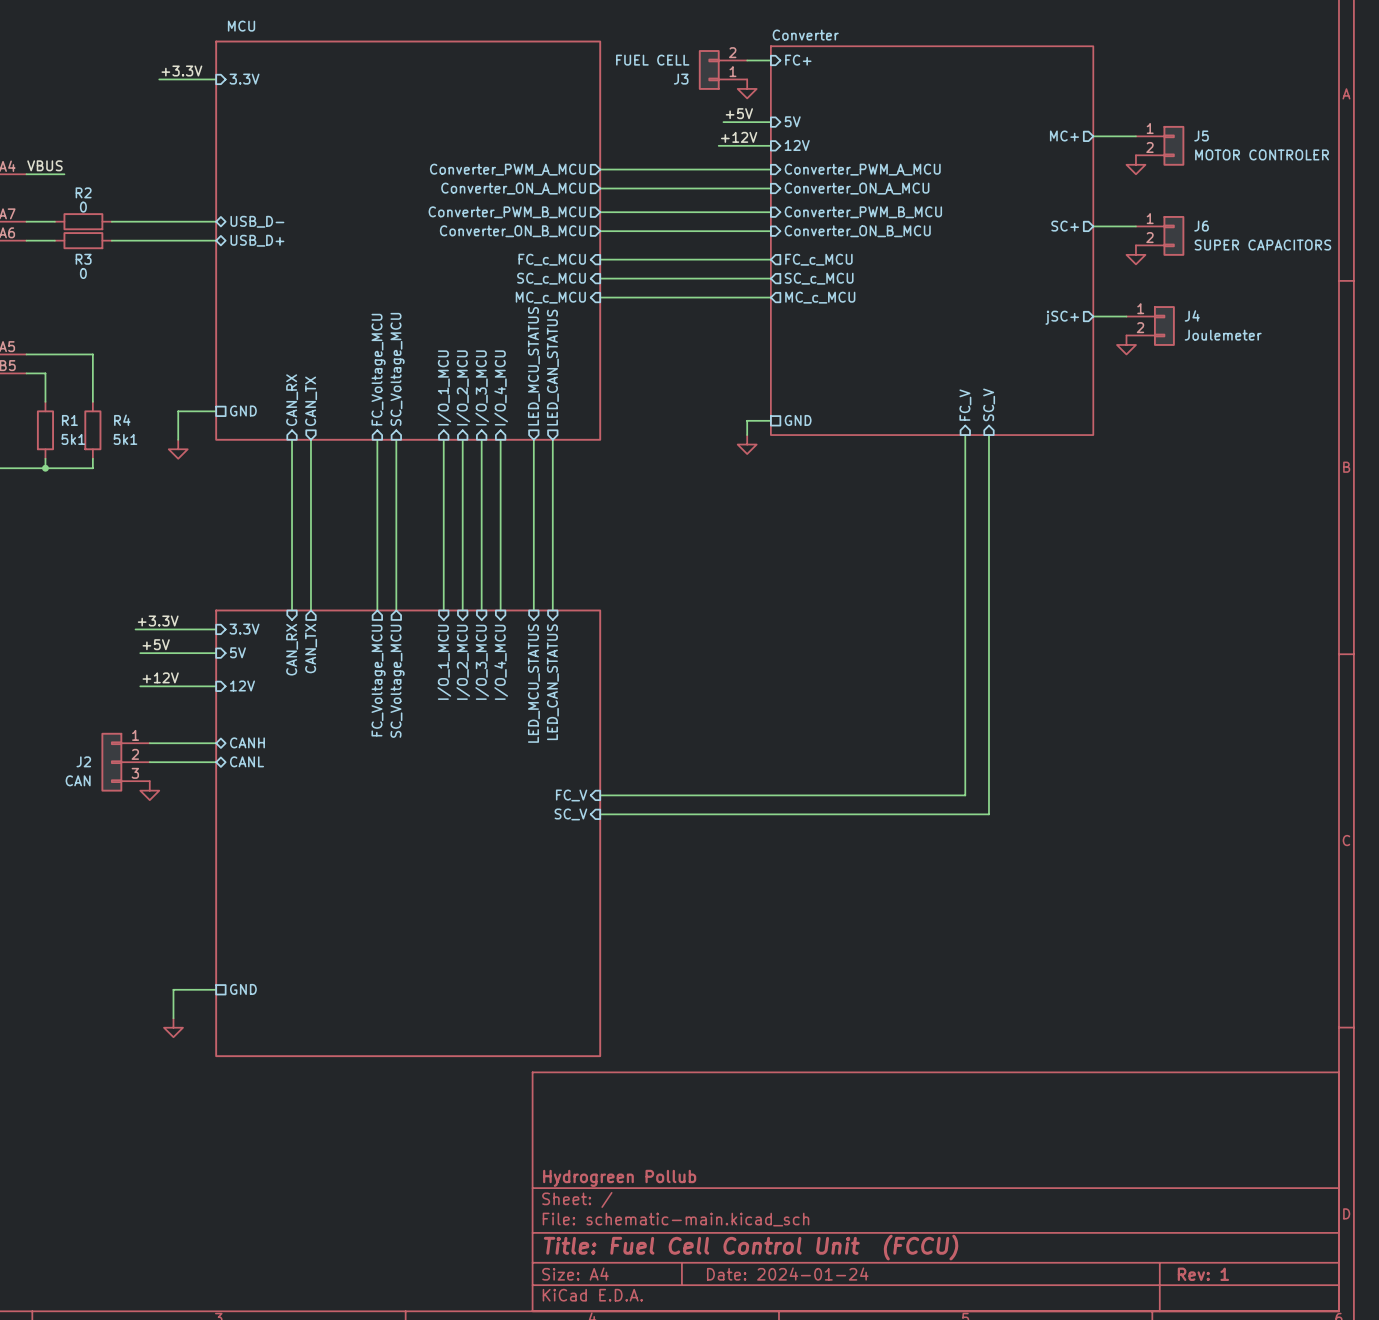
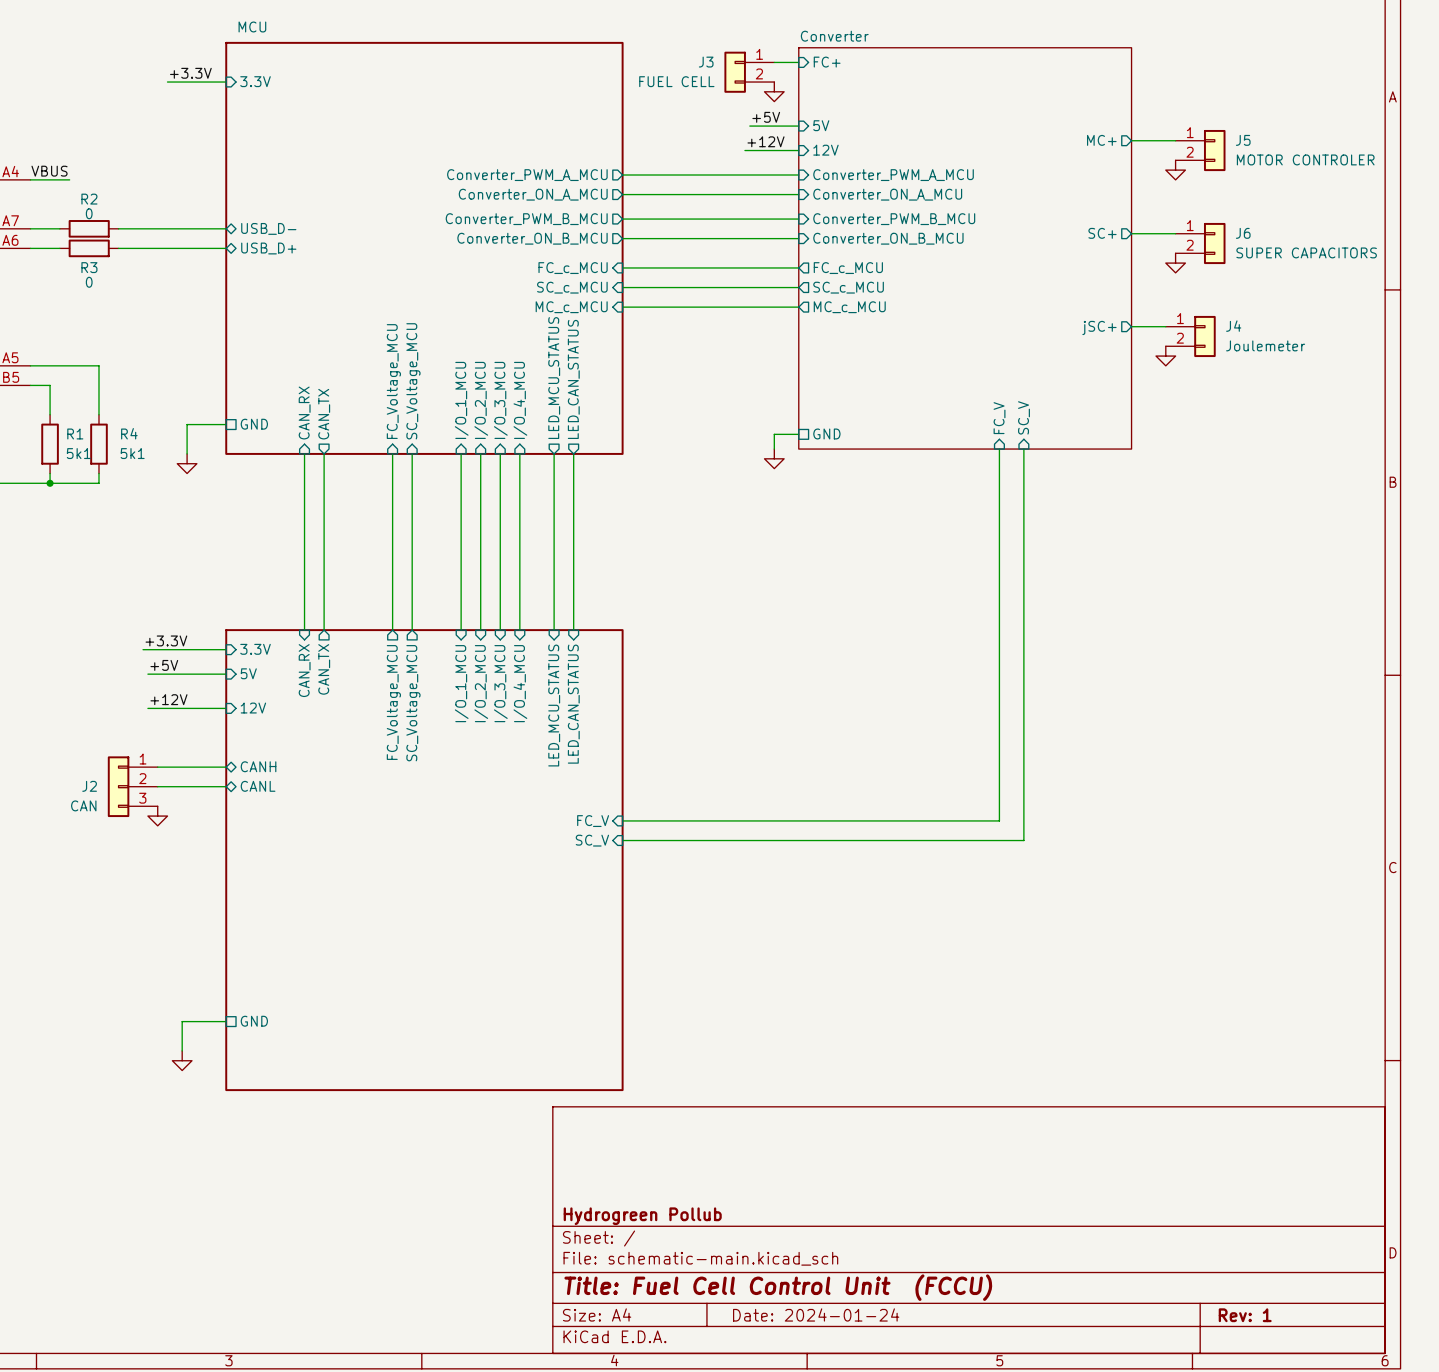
J3 flip: as is (709, 69) -> up-down (735, 72)

